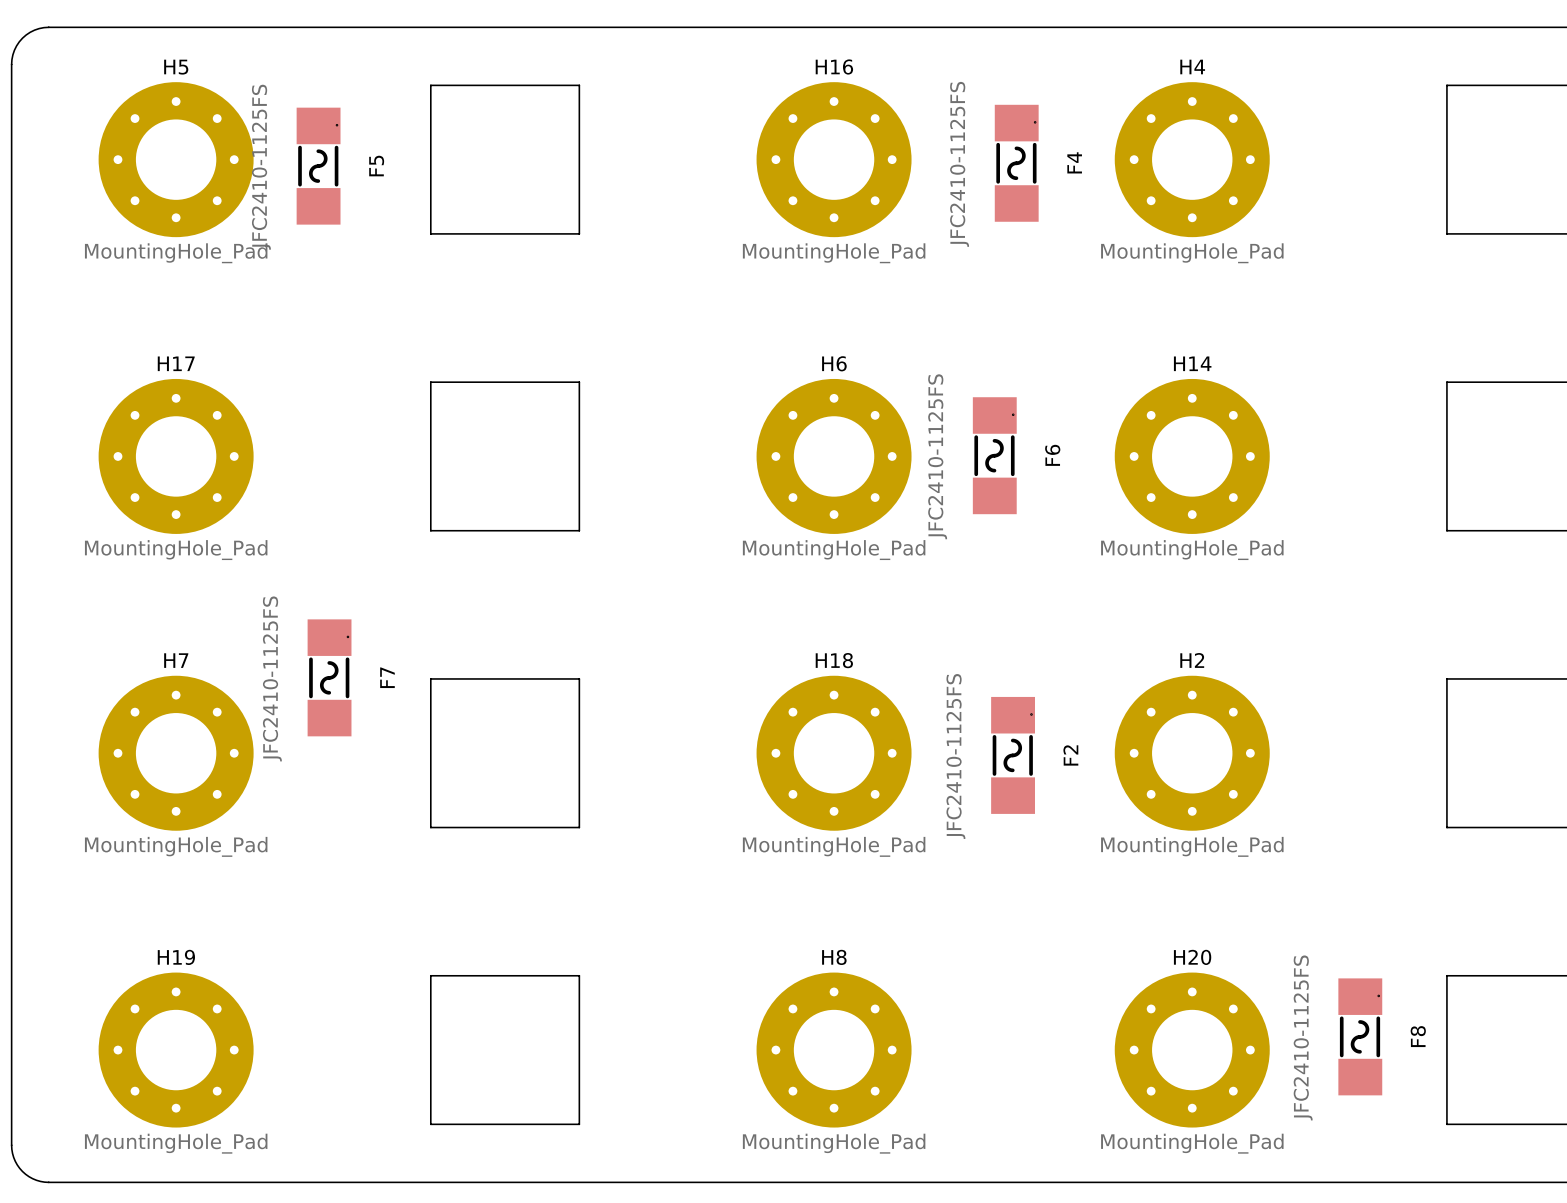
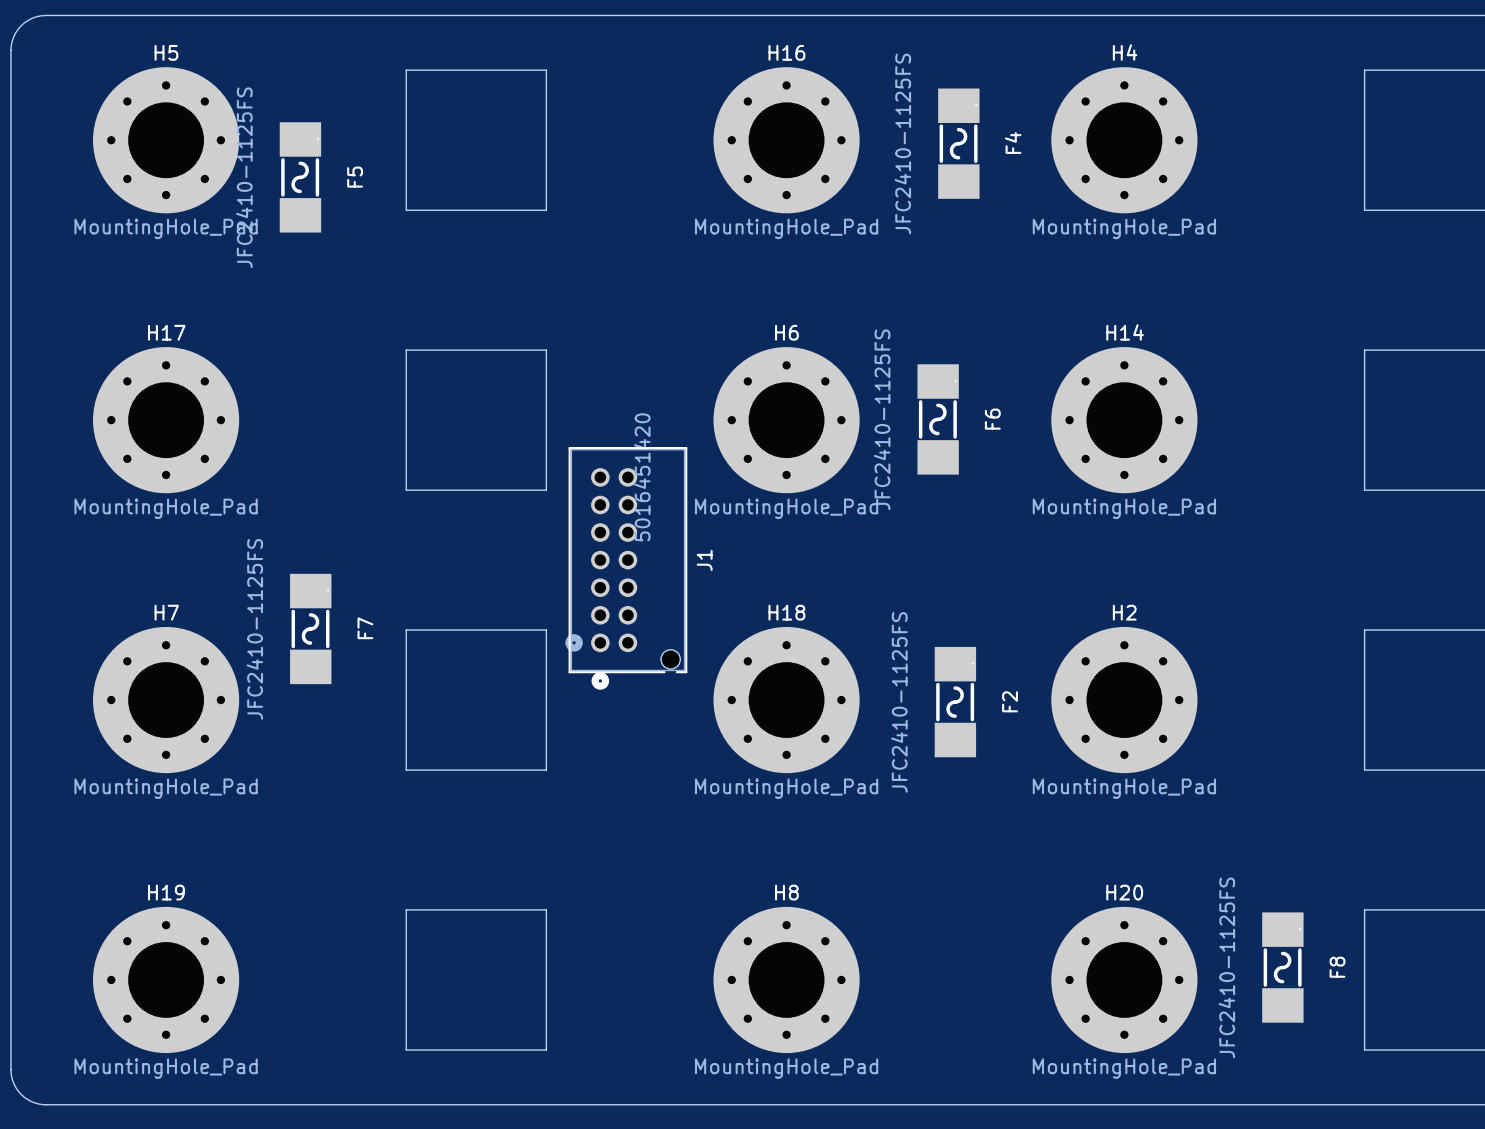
F5 position: (318, 166) -> (300, 177)
J1: none -> 5016451420 (626, 568)

